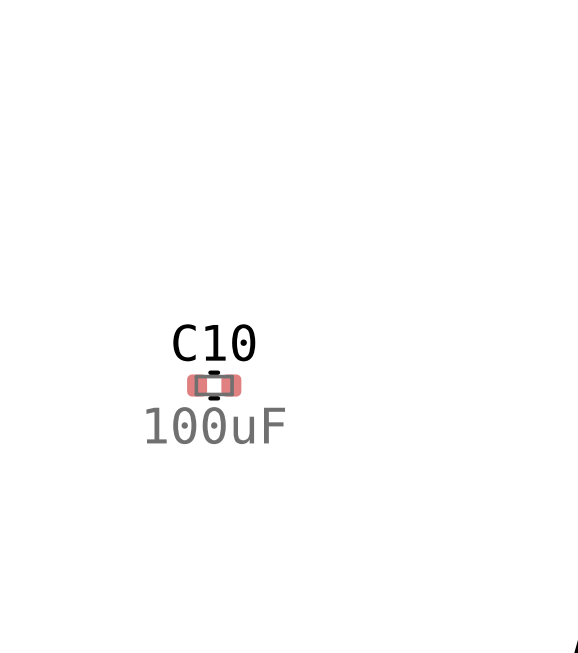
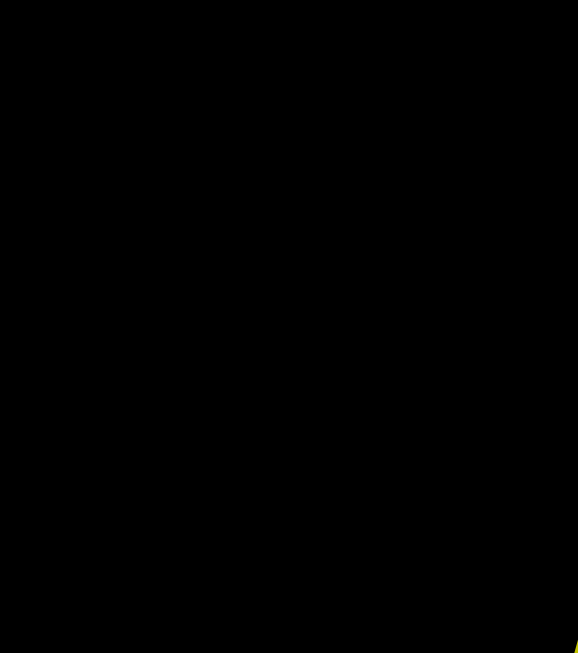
C10: 100uF (214, 385) -> none

